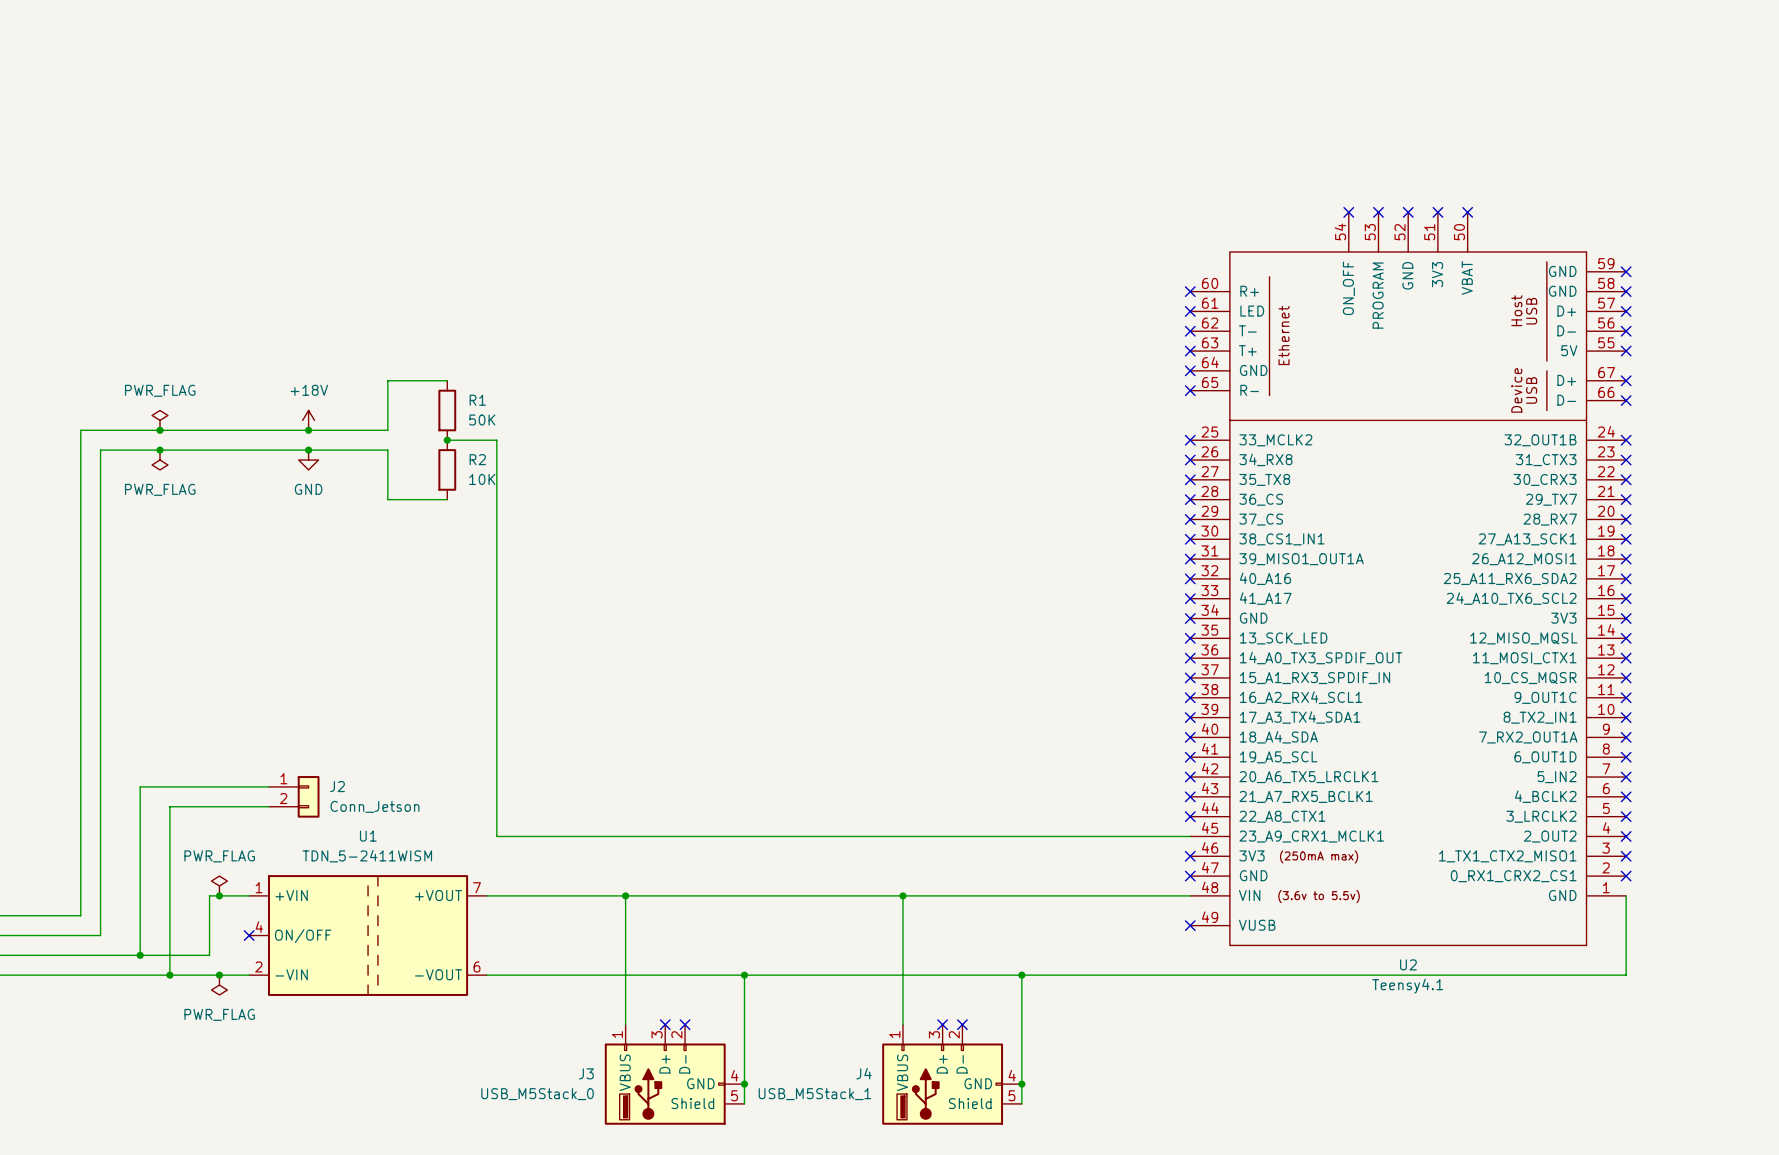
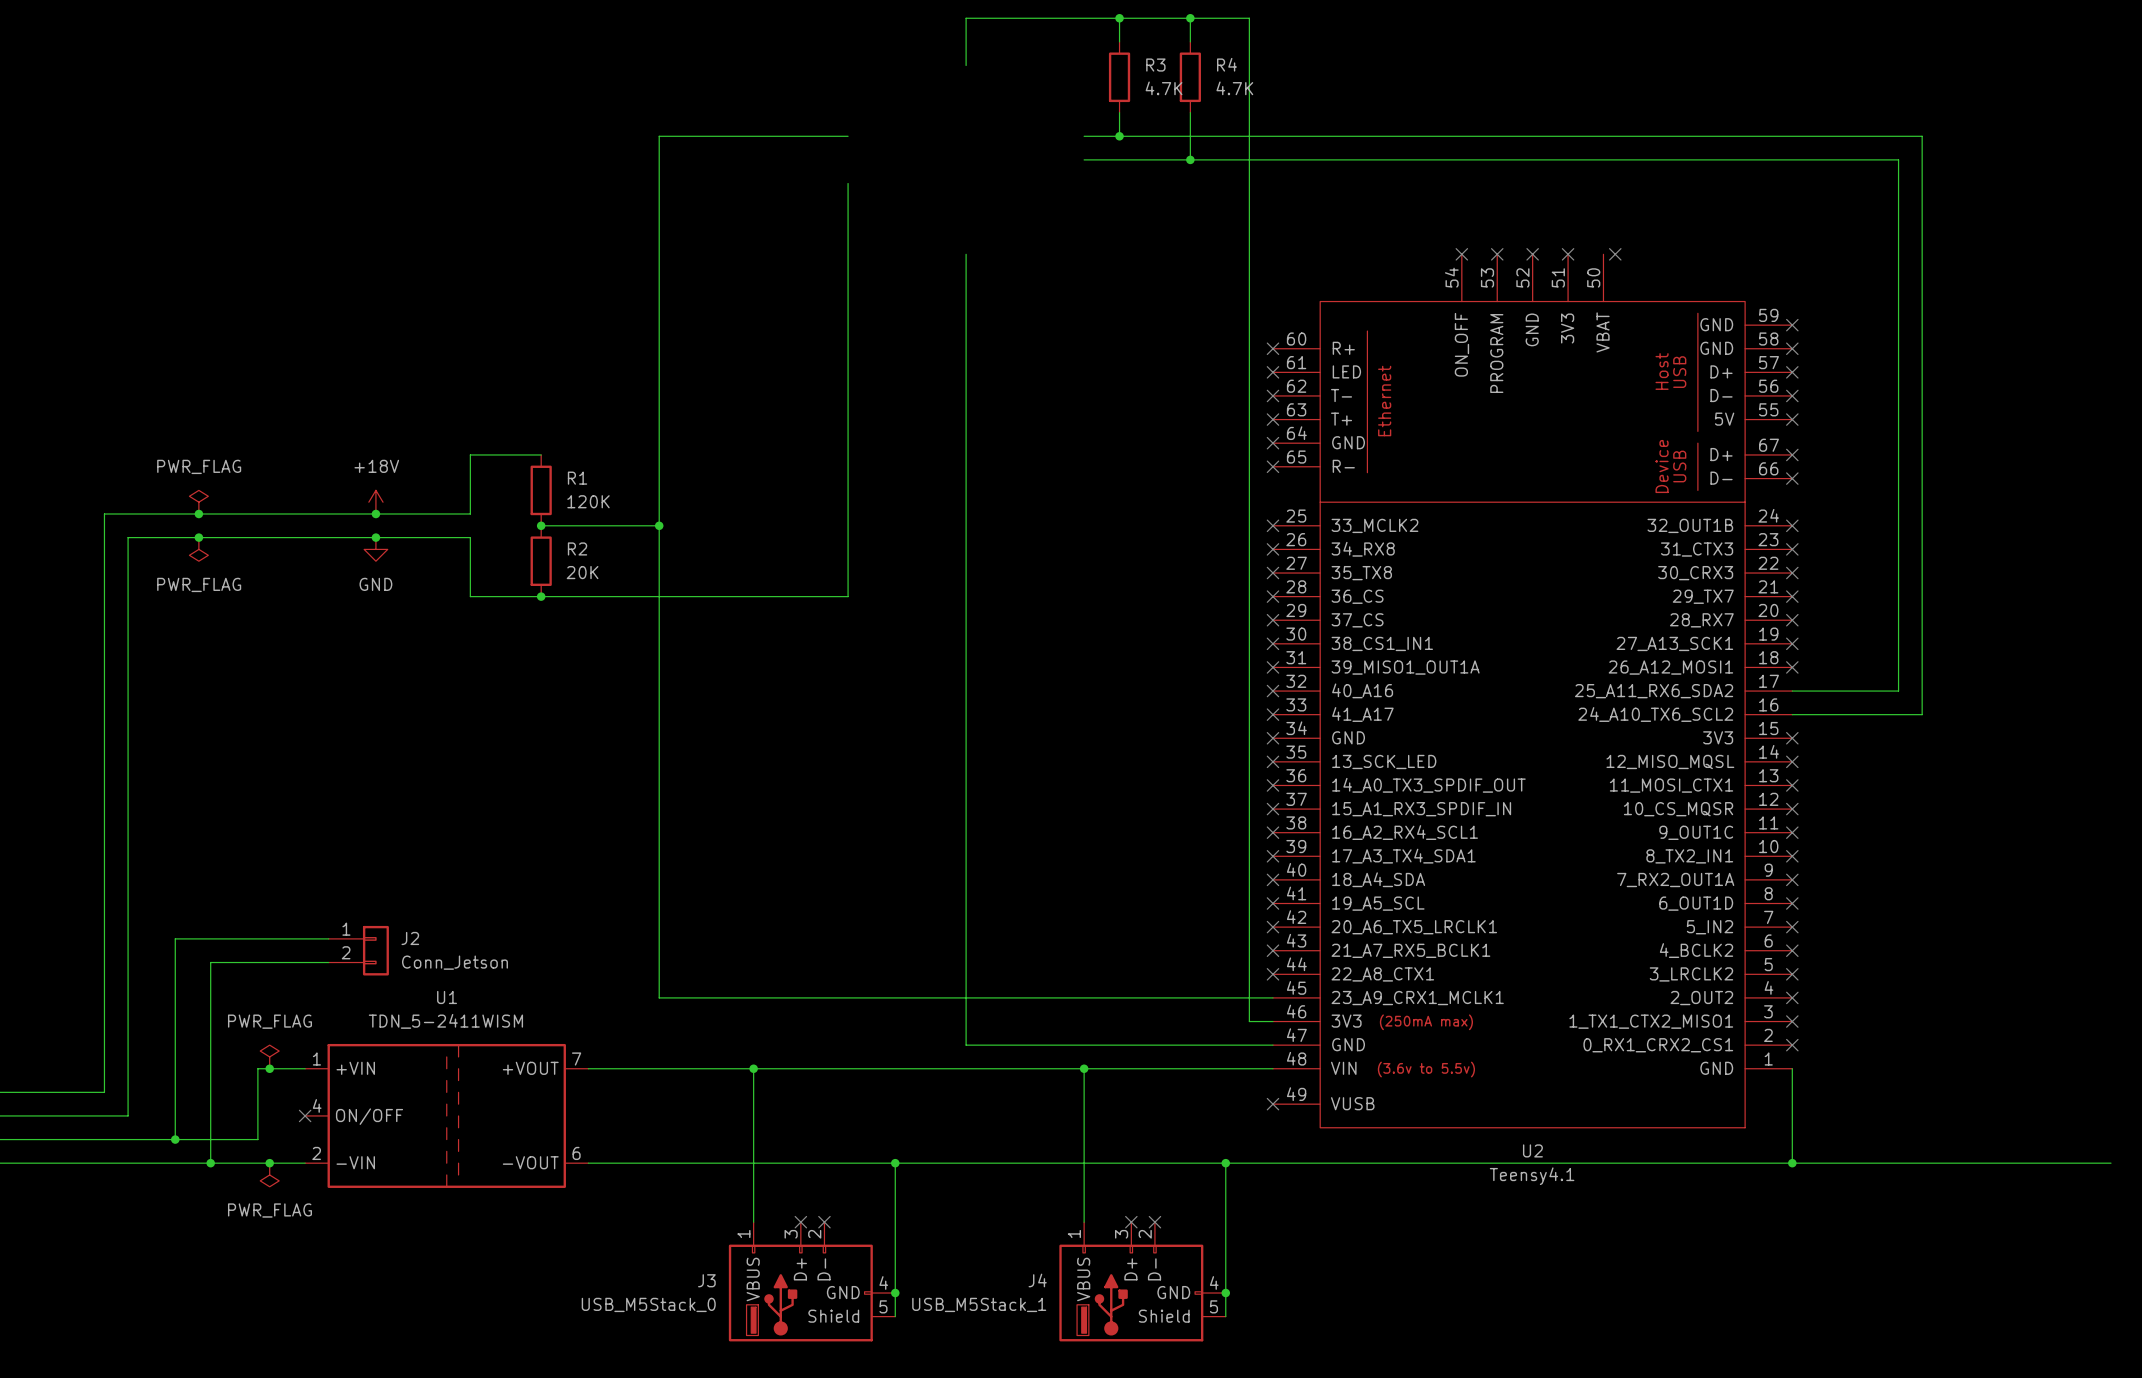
wire: none -> (1119, 18) (1119, 41)
junction: none -> (1119, 18)
wire: none -> (1190, 18) (1190, 41)
junction: none -> (1190, 18)
wire: none -> (966, 65) (966, 18) (1249, 18) (1249, 1021) (1272, 1021)
R3: none -> 4.7K (1119, 77)
R4: none -> 4.7K (1190, 77)
wire: none -> (1119, 112) (1119, 136)
wire: none -> (1190, 112) (1190, 159)
wire: none -> (1084, 136) (1922, 136) (1922, 714) (1792, 714)
junction: none -> (1119, 136)
wire: none -> (1084, 159) (1898, 159) (1898, 691) (1792, 691)
junction: none -> (1190, 159)
wire: none -> (848, 183) (848, 596) (541, 596)
wire: none -> (966, 254) (966, 1045) (1272, 1045)
no-connect mark: none -> (1461, 254)
no-connect mark: none -> (1497, 254)
no-connect mark: none -> (1532, 254)
no-connect mark: none -> (1568, 254)
no-connect mark: (1378, 212) -> none
no-connect mark: (1408, 212) -> none
no-connect mark: (1437, 212) -> none
no-connect mark: (1467, 212) -> none
no-connect mark: none -> (1792, 325)
no-connect mark: (1626, 271) -> none
no-connect mark: none -> (1272, 348)
no-connect mark: (1190, 291) -> none
no-connect mark: none -> (1792, 348)
no-connect mark: (1626, 291) -> none
no-connect mark: none -> (1272, 372)
no-connect mark: (1190, 311) -> none
no-connect mark: none -> (1792, 372)
no-connect mark: (1626, 311) -> none
no-connect mark: none -> (1272, 395)
no-connect mark: (1190, 331) -> none
no-connect mark: none -> (1792, 395)
no-connect mark: (1626, 331) -> none
no-connect mark: none -> (1272, 419)
no-connect mark: (1190, 351) -> none
no-connect mark: none -> (1792, 419)
no-connect mark: (1626, 351) -> none
no-connect mark: none -> (1272, 443)
no-connect mark: (1190, 370) -> none
no-connect mark: none -> (1792, 454)
no-connect mark: (1626, 380) -> none
no-connect mark: none -> (1272, 466)
no-connect mark: (1190, 390) -> none
no-connect mark: none -> (1792, 478)
no-connect mark: (1626, 400) -> none
R1 value: 50K (482, 420) -> 120K (588, 501)
wire: (496, 440) (496, 836) (546, 836) -> (848, 136) (659, 136) (659, 997)
wire: none -> (600, 525) (659, 525)
junction: none -> (659, 525)
no-connect mark: none -> (1272, 525)
no-connect mark: (1190, 440) -> none
no-connect mark: none -> (1792, 525)
no-connect mark: (1626, 440) -> none
no-connect mark: none -> (1272, 549)
no-connect mark: (1190, 460) -> none
no-connect mark: none -> (1792, 549)
no-connect mark: (1626, 460) -> none
R2 value: 10K (482, 479) -> 20K (582, 572)
no-connect mark: none -> (1272, 573)
no-connect mark: (1190, 479) -> none
no-connect mark: none -> (1792, 573)
no-connect mark: (1626, 479) -> none
junction: none -> (541, 596)
no-connect mark: none -> (1272, 596)
no-connect mark: (1190, 499) -> none
no-connect mark: none -> (1792, 596)
no-connect mark: (1626, 499) -> none
no-connect mark: none -> (1272, 620)
no-connect mark: (1190, 519) -> none
no-connect mark: none -> (1792, 620)
no-connect mark: (1626, 519) -> none
no-connect mark: none -> (1272, 643)
no-connect mark: (1190, 539) -> none
no-connect mark: none -> (1792, 643)
no-connect mark: (1626, 539) -> none
no-connect mark: none -> (1272, 667)
no-connect mark: (1190, 559) -> none
no-connect mark: none -> (1792, 667)
no-connect mark: (1626, 559) -> none
no-connect mark: none -> (1272, 691)
no-connect mark: (1190, 578) -> none
U2 position: (1408, 578) -> (1532, 691)
no-connect mark: (1626, 578) -> none
no-connect mark: none -> (1272, 714)
no-connect mark: (1190, 598) -> none
no-connect mark: (1626, 598) -> none
no-connect mark: none -> (1272, 738)
no-connect mark: (1190, 618) -> none
no-connect mark: none -> (1792, 738)
no-connect mark: (1626, 618) -> none
no-connect mark: none -> (1272, 761)
no-connect mark: (1190, 638) -> none
no-connect mark: none -> (1792, 761)
no-connect mark: (1626, 638) -> none
no-connect mark: none -> (1272, 785)
no-connect mark: (1190, 658) -> none
no-connect mark: none -> (1792, 785)
no-connect mark: (1626, 658) -> none
no-connect mark: none -> (1272, 809)
no-connect mark: (1190, 677) -> none
no-connect mark: none -> (1792, 809)
no-connect mark: (1626, 677) -> none
no-connect mark: none -> (1272, 832)
no-connect mark: (1190, 697) -> none
no-connect mark: none -> (1792, 832)
no-connect mark: (1626, 697) -> none
no-connect mark: none -> (1272, 856)
no-connect mark: (1190, 717) -> none
no-connect mark: none -> (1792, 856)
no-connect mark: (1626, 717) -> none
no-connect mark: none -> (1272, 879)
no-connect mark: (1190, 737) -> none
no-connect mark: none -> (1792, 879)
no-connect mark: (1626, 737) -> none
no-connect mark: none -> (1272, 903)
no-connect mark: (1190, 757) -> none
no-connect mark: none -> (1792, 903)
no-connect mark: (1626, 757) -> none
no-connect mark: none -> (1272, 927)
no-connect mark: (1190, 777) -> none
no-connect mark: none -> (1792, 927)
no-connect mark: (1626, 777) -> none
no-connect mark: none -> (1272, 950)
no-connect mark: (1190, 796) -> none
no-connect mark: none -> (1792, 950)
no-connect mark: (1626, 796) -> none
no-connect mark: none -> (1272, 974)
no-connect mark: (1190, 816) -> none
no-connect mark: none -> (1792, 974)
no-connect mark: (1626, 816) -> none
wire: (1061, 836) (1190, 836) -> none
no-connect mark: none -> (1792, 997)
no-connect mark: (1626, 836) -> none
no-connect mark: (1190, 856) -> none
no-connect mark: none -> (1792, 1021)
no-connect mark: (1626, 856) -> none
no-connect mark: (1190, 876) -> none
no-connect mark: none -> (1792, 1045)
no-connect mark: (1626, 876) -> none
wire: (1061, 895) (1190, 895) -> none
wire: none -> (1792, 1068) (1792, 1163)
wire: (1626, 895) (1626, 975) -> (2111, 1163) (1945, 1163)
no-connect mark: none -> (1272, 1104)
no-connect mark: (1190, 925) -> none
junction: none -> (1792, 1163)

